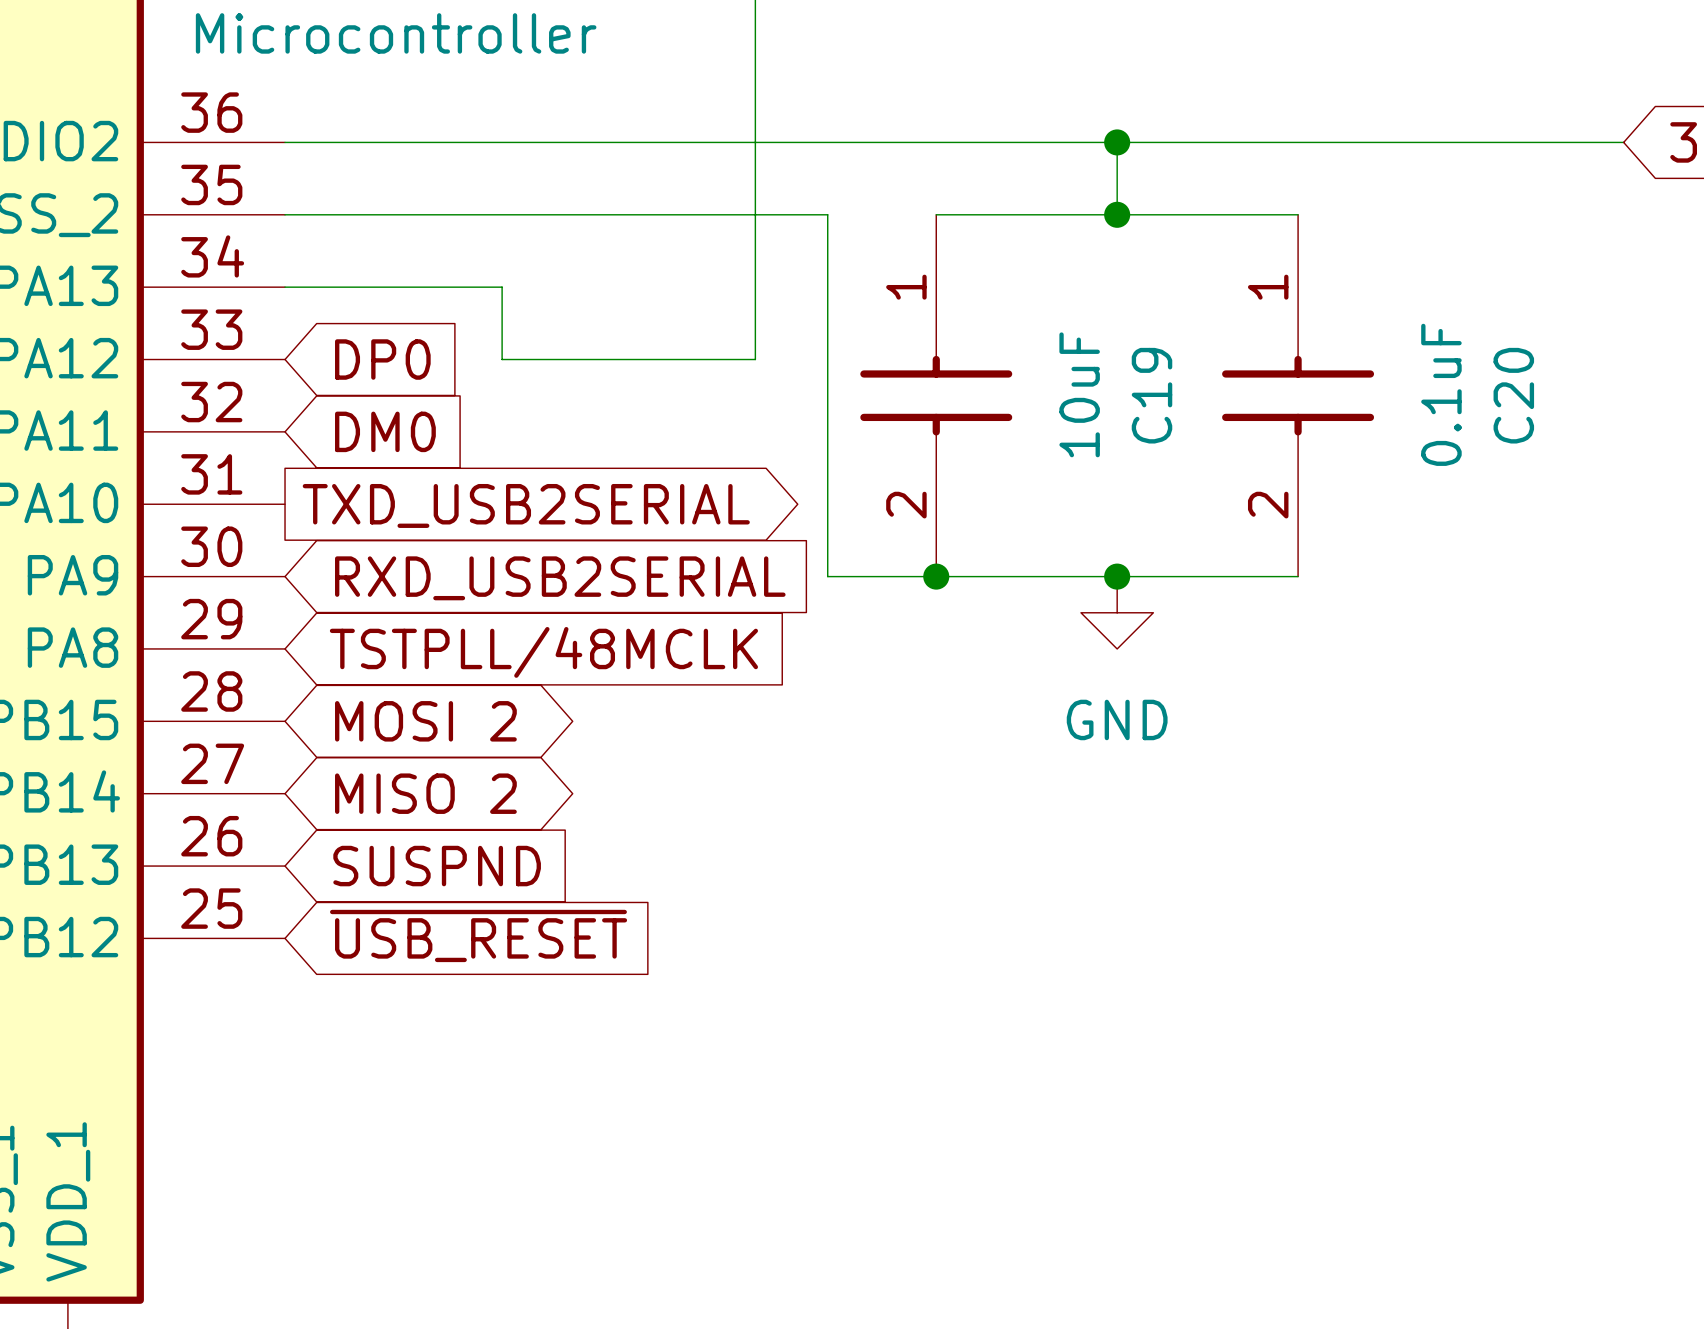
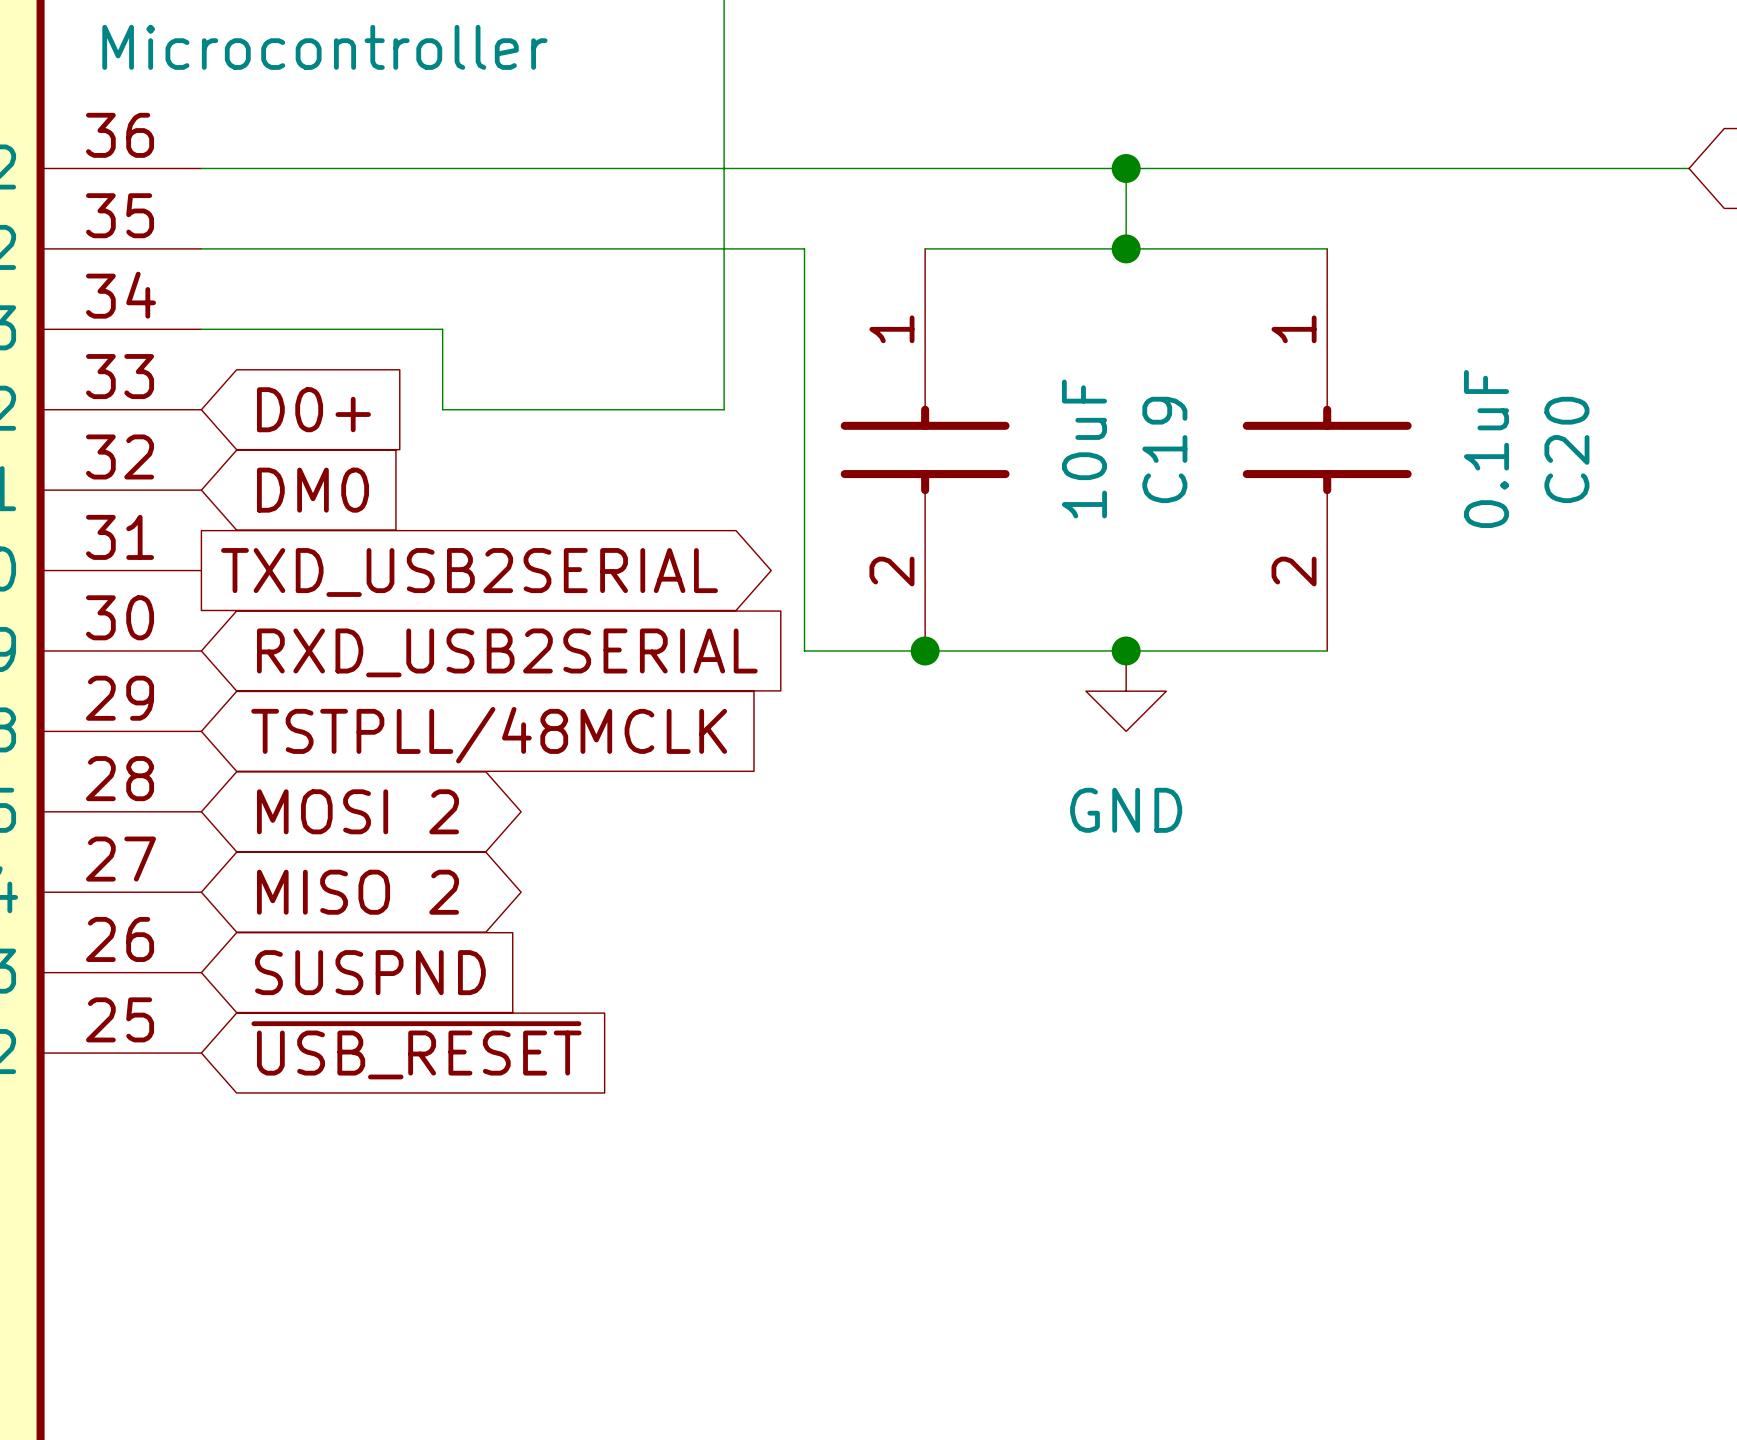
global label: DP0 (382, 359) -> D0+ (313, 409)

